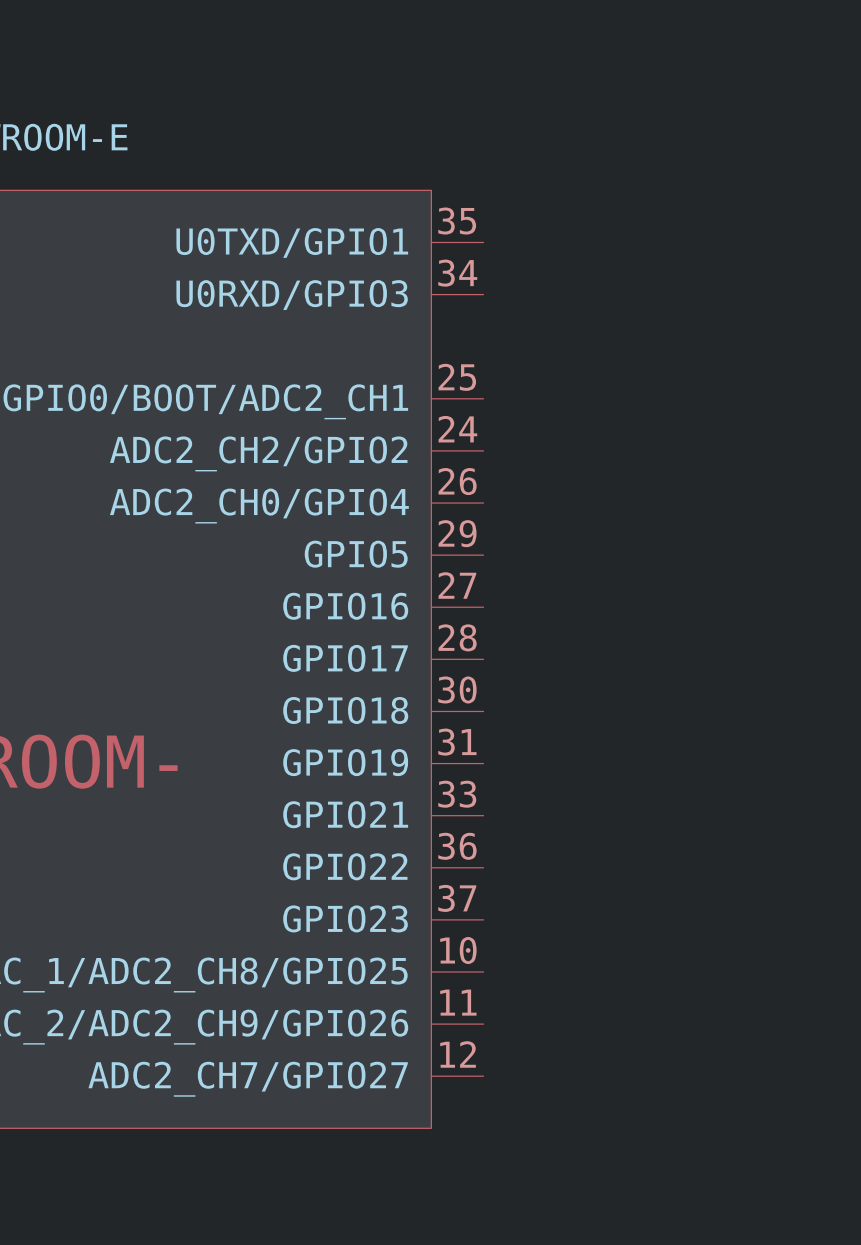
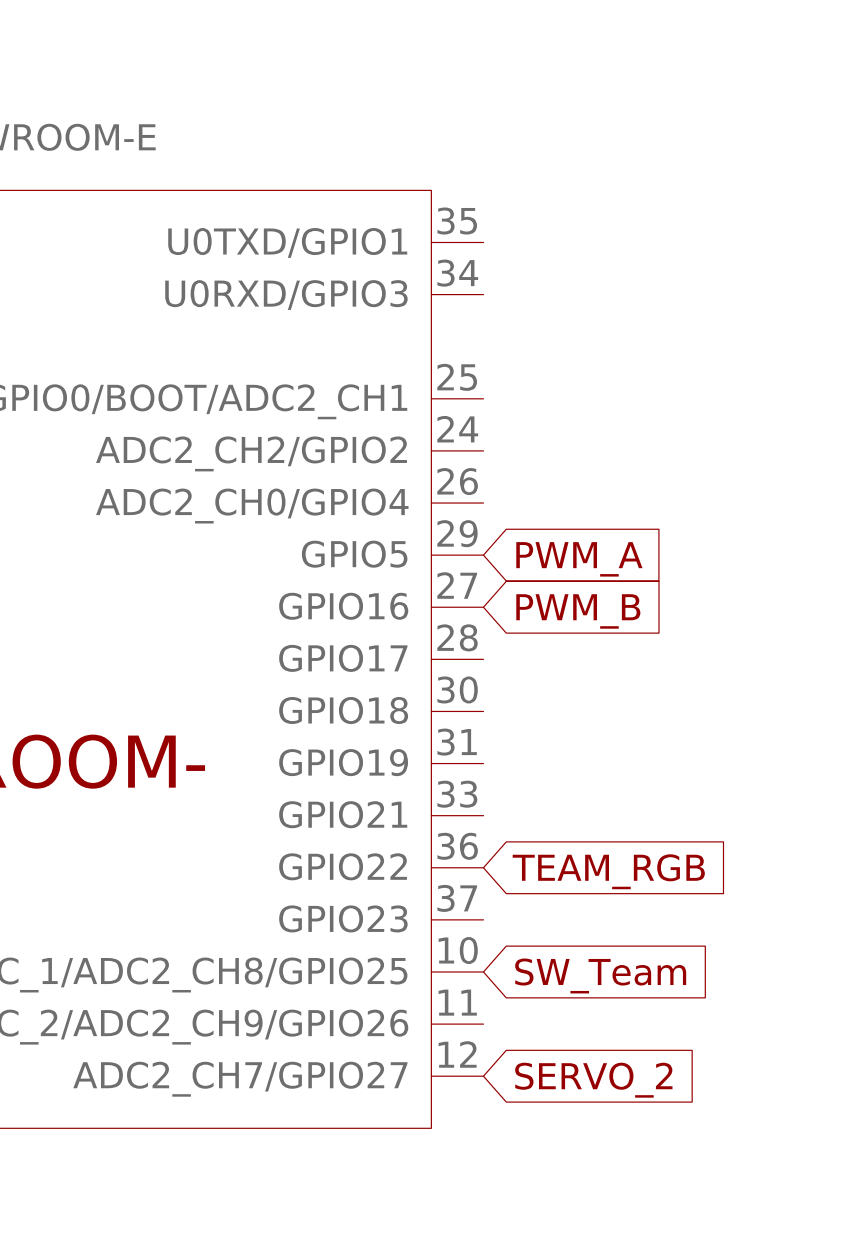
global label: none -> PWM_A (579, 559)
global label: none -> PWM_B (578, 611)
global label: none -> TEAM_RGB (608, 871)
global label: none -> SW_Team (600, 975)
global label: none -> SERVO_2 (593, 1080)

